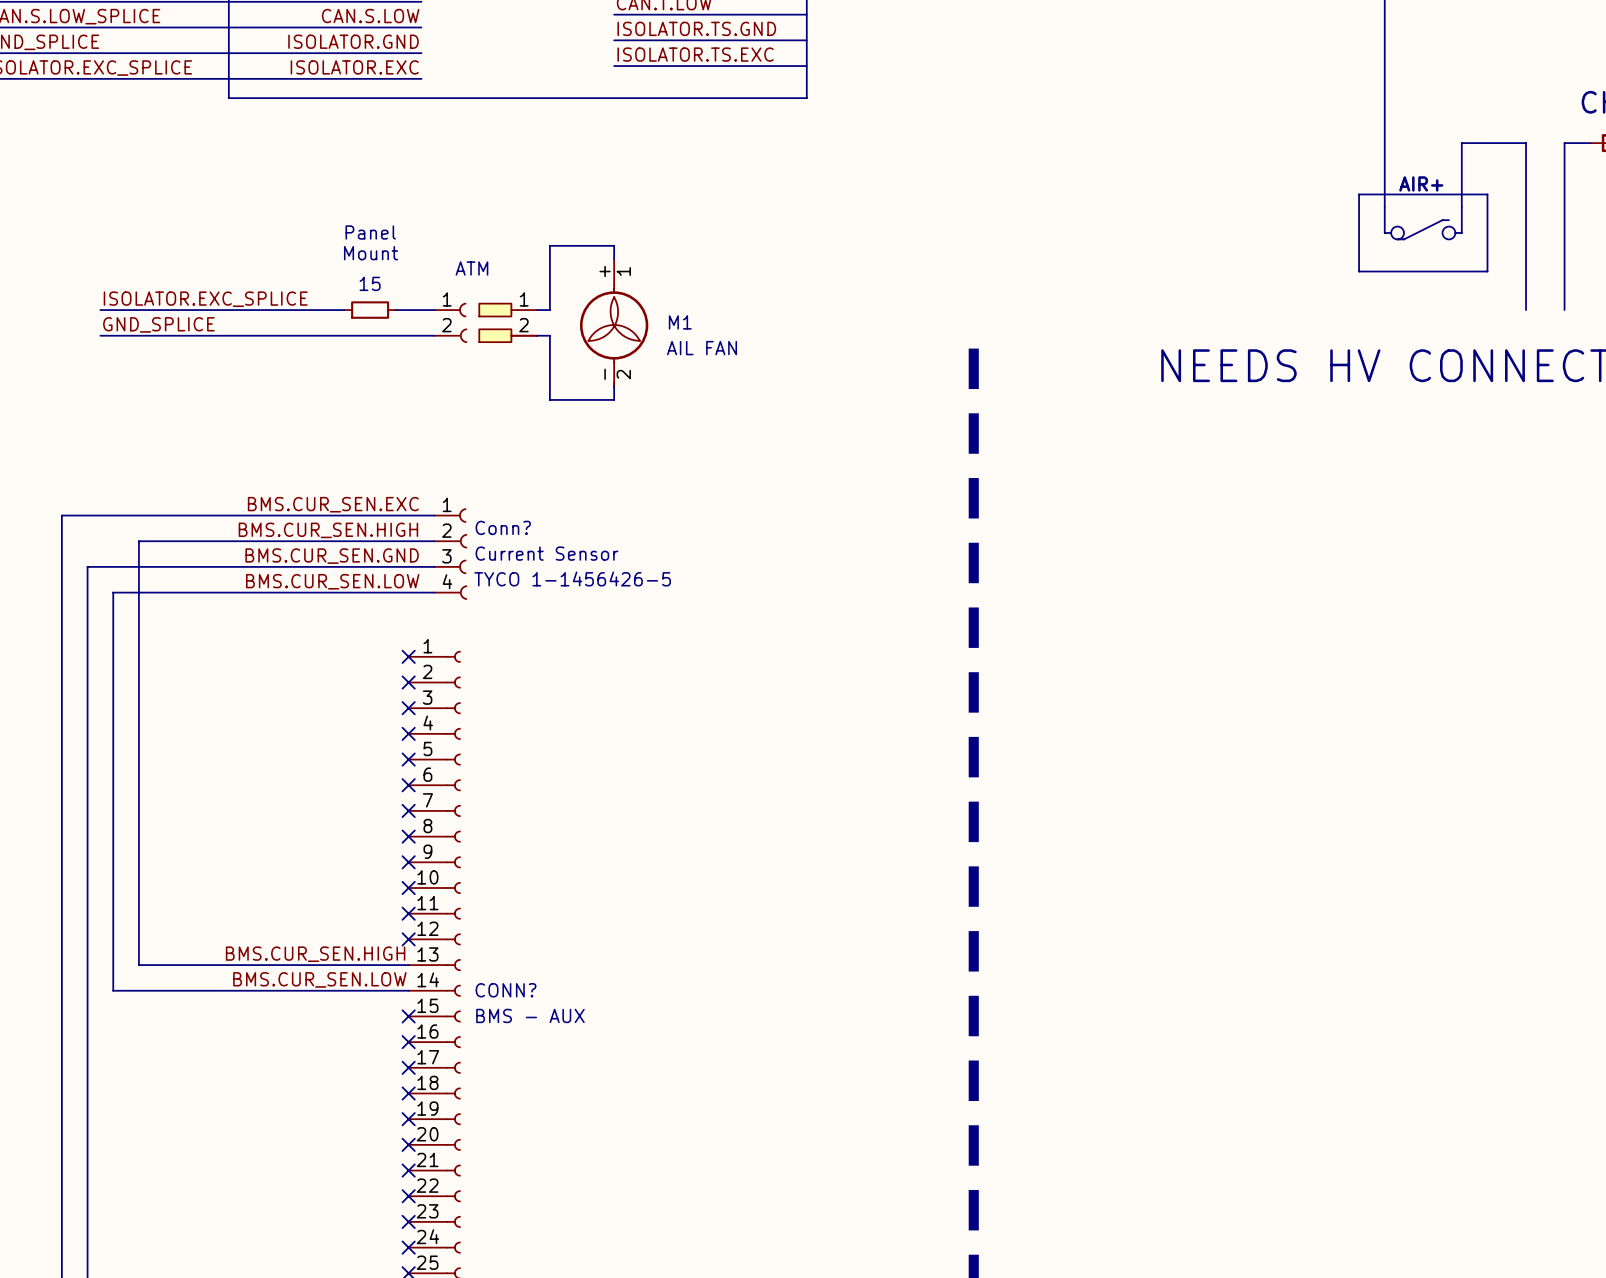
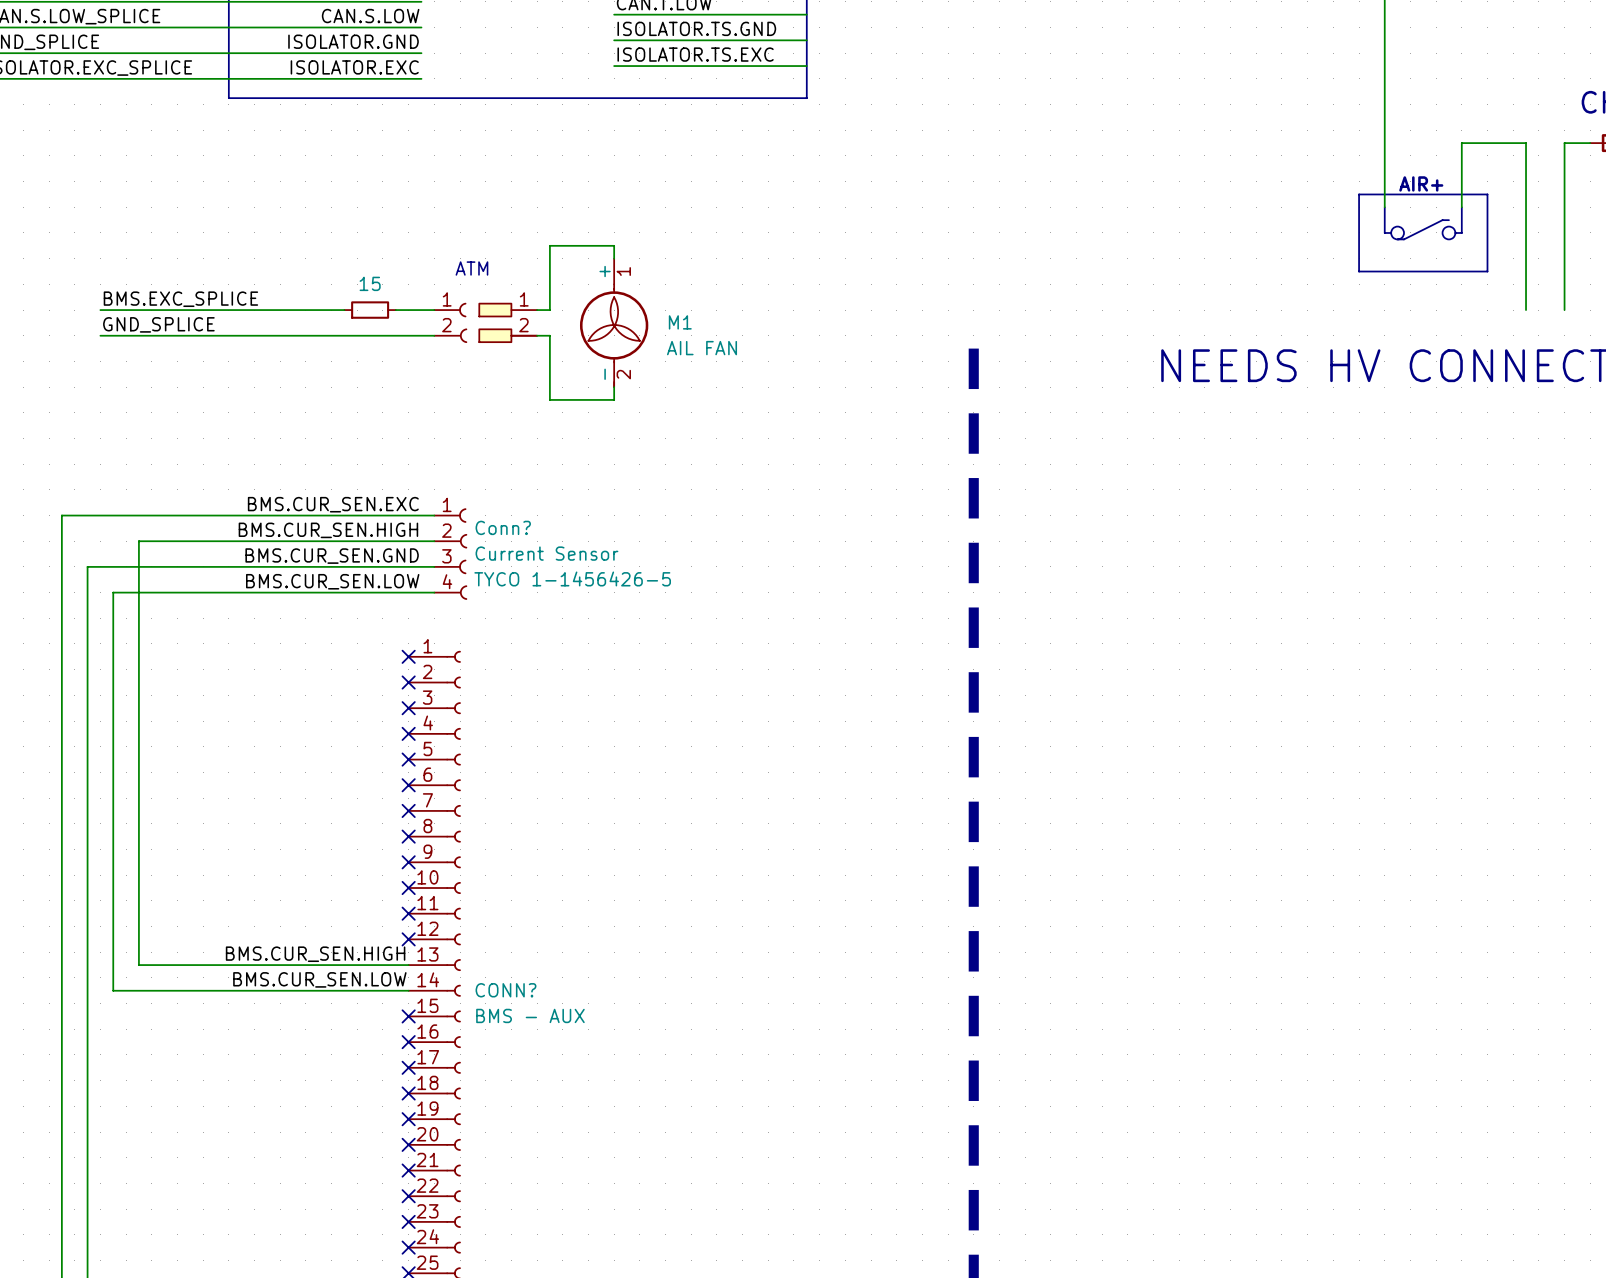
text: Panel (370, 232) -> none
text: Mount (371, 253) -> none
label: ISOLATOR.EXC_SPLICE (205, 299) -> BMS.EXC_SPLICE (180, 299)

